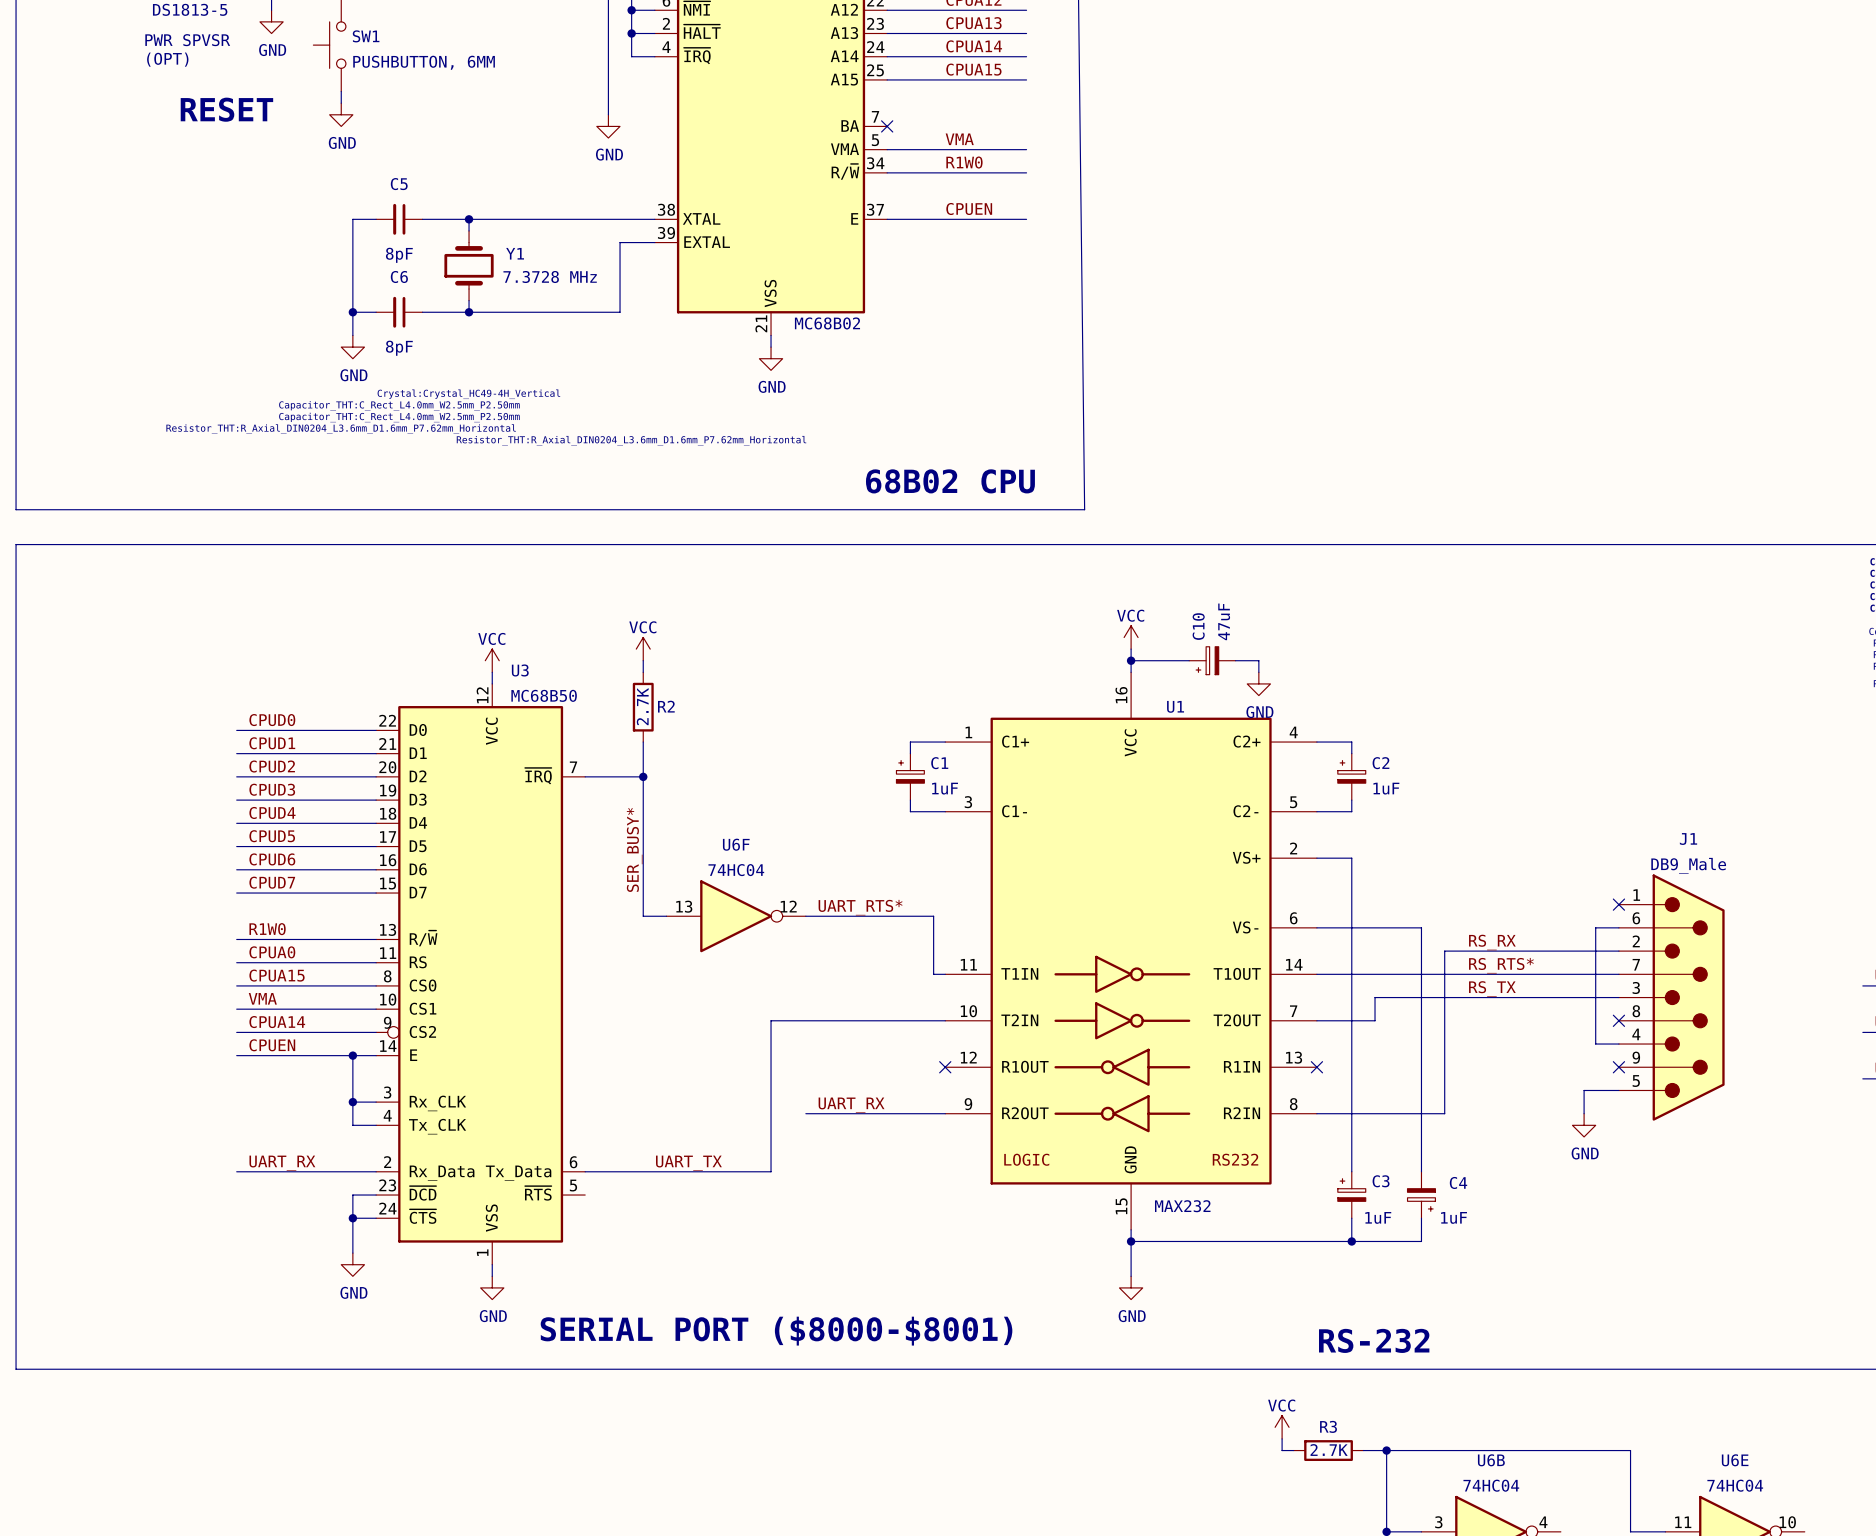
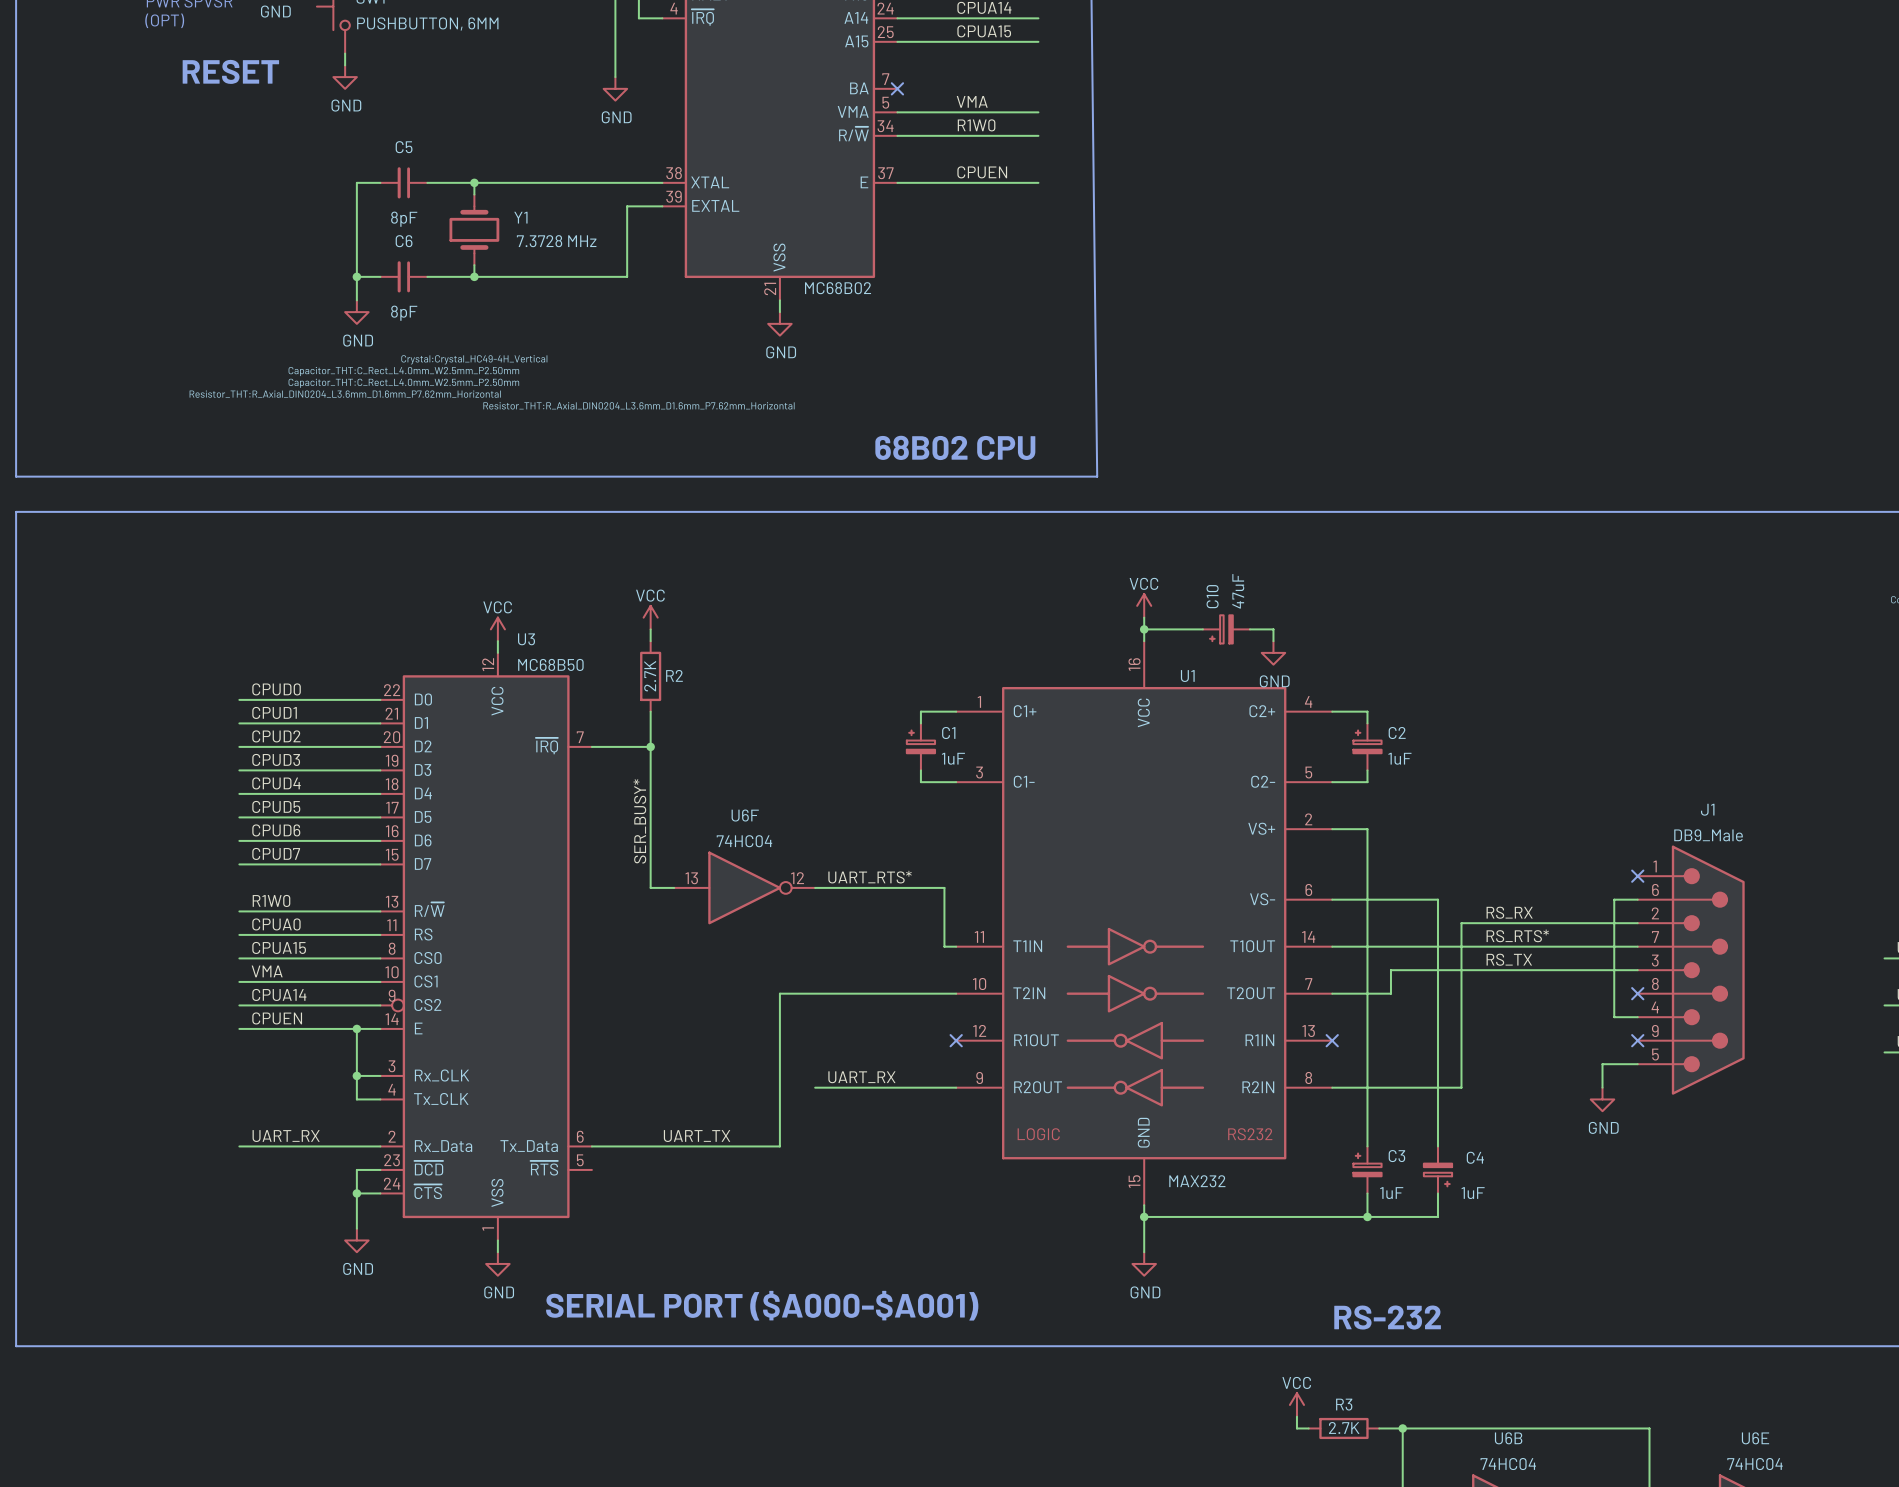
text: SERIAL PORT ($8000-$8001) (776, 1331) -> SERIAL PORT ($A000-$A001) (762, 1305)

